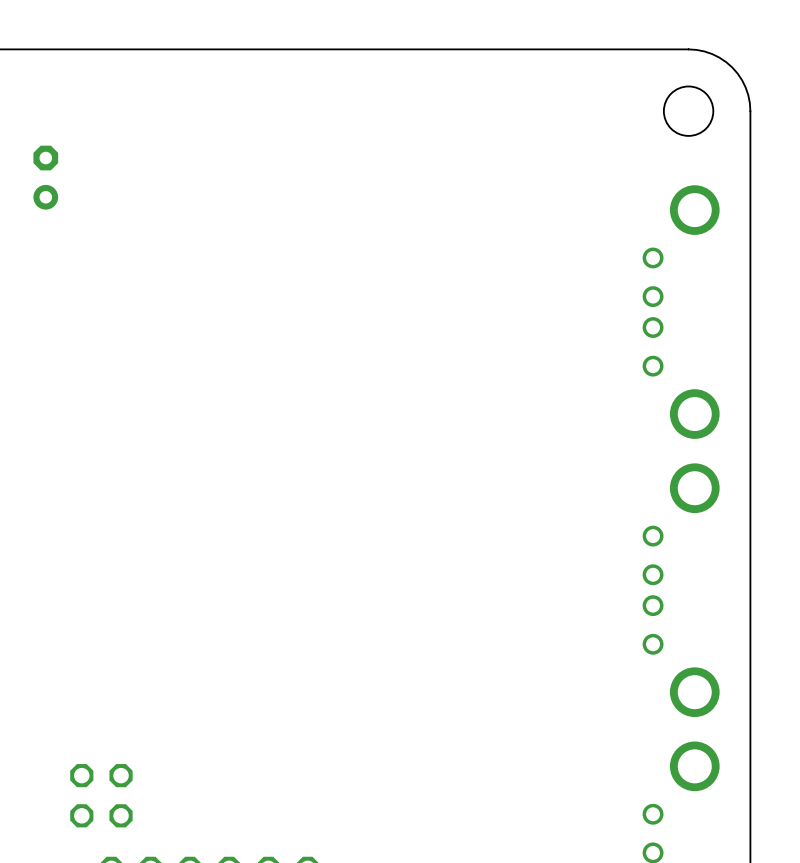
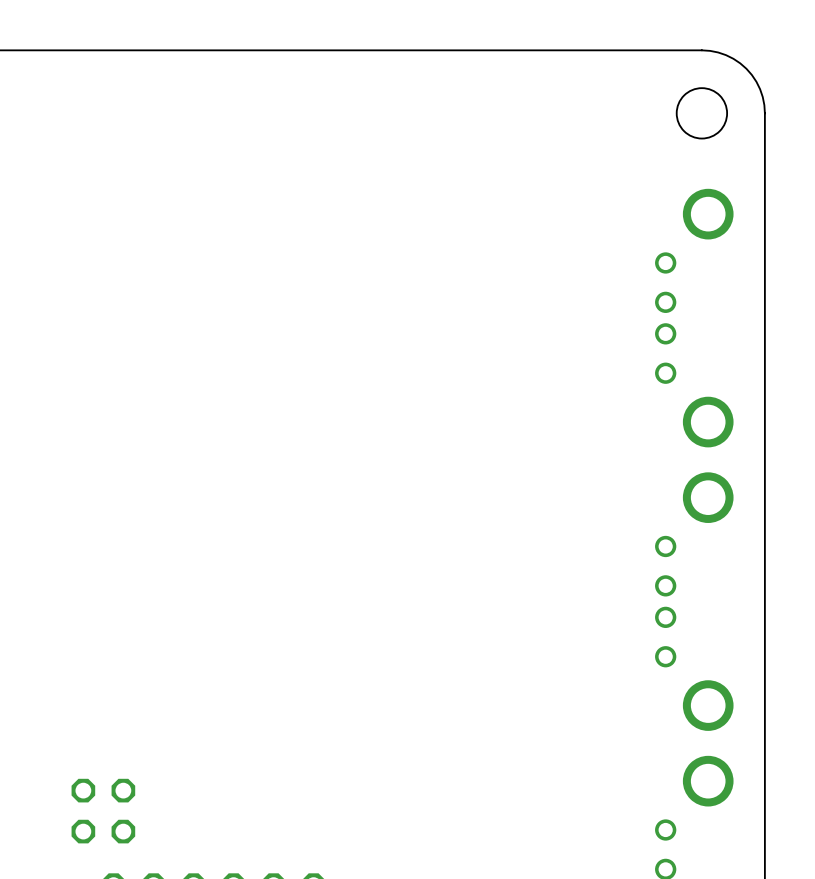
part: (45, 177) -> none

